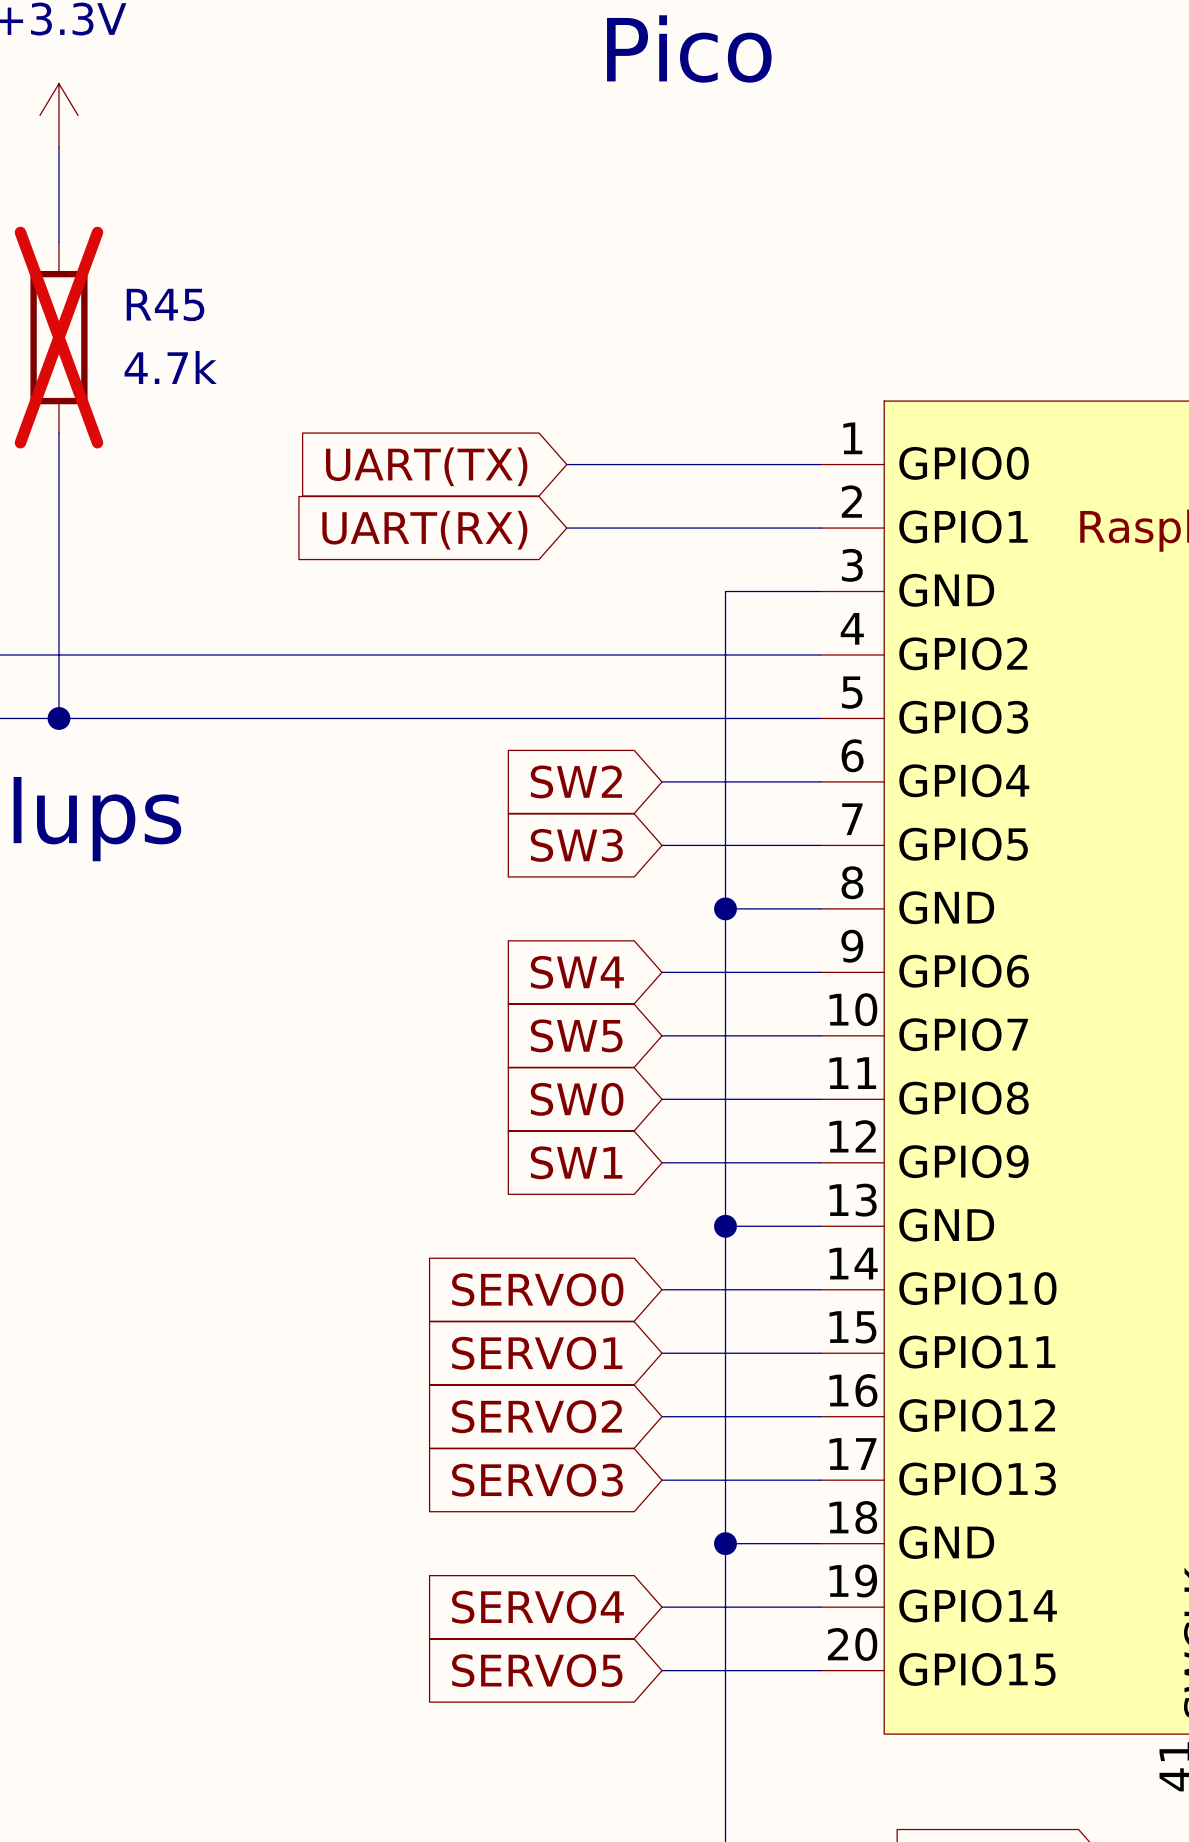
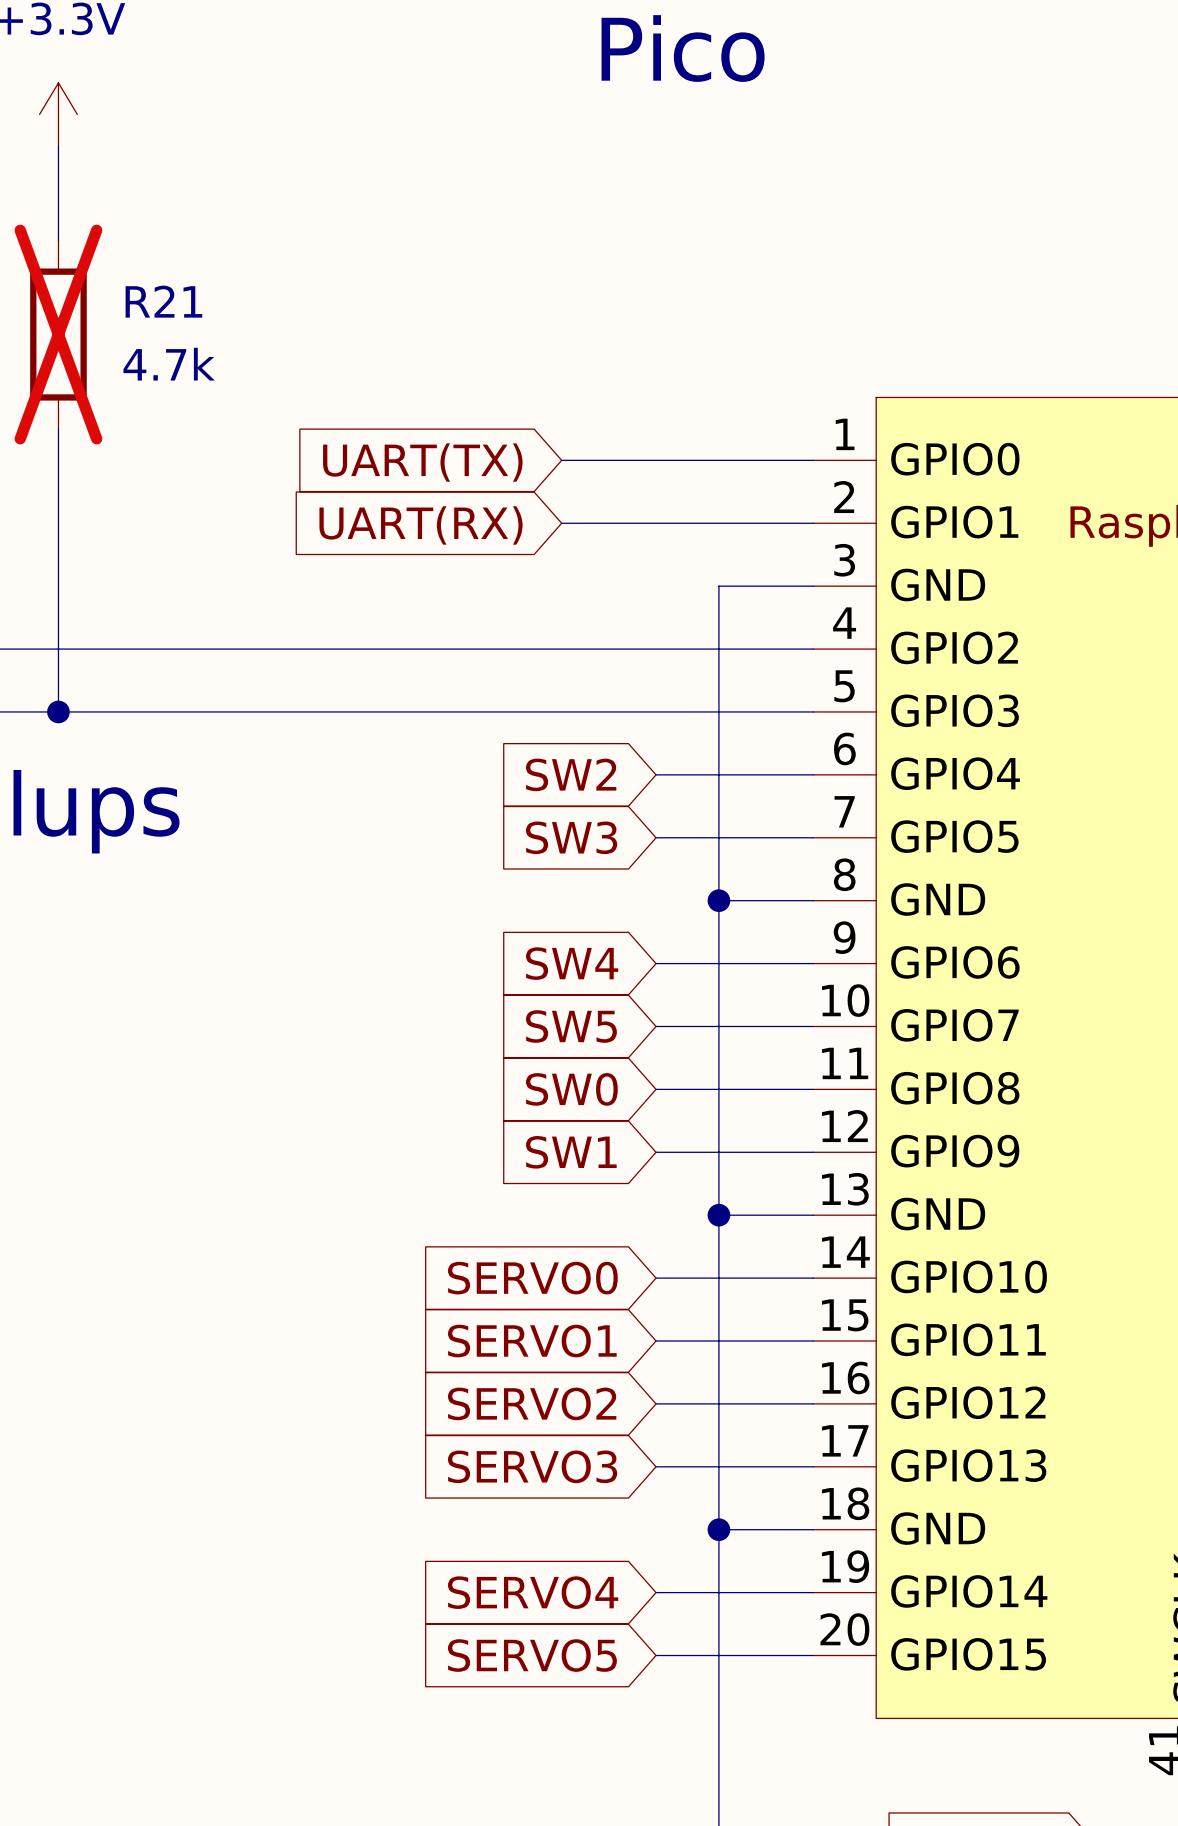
R45 name: R45 (165, 304) -> R21 (163, 301)

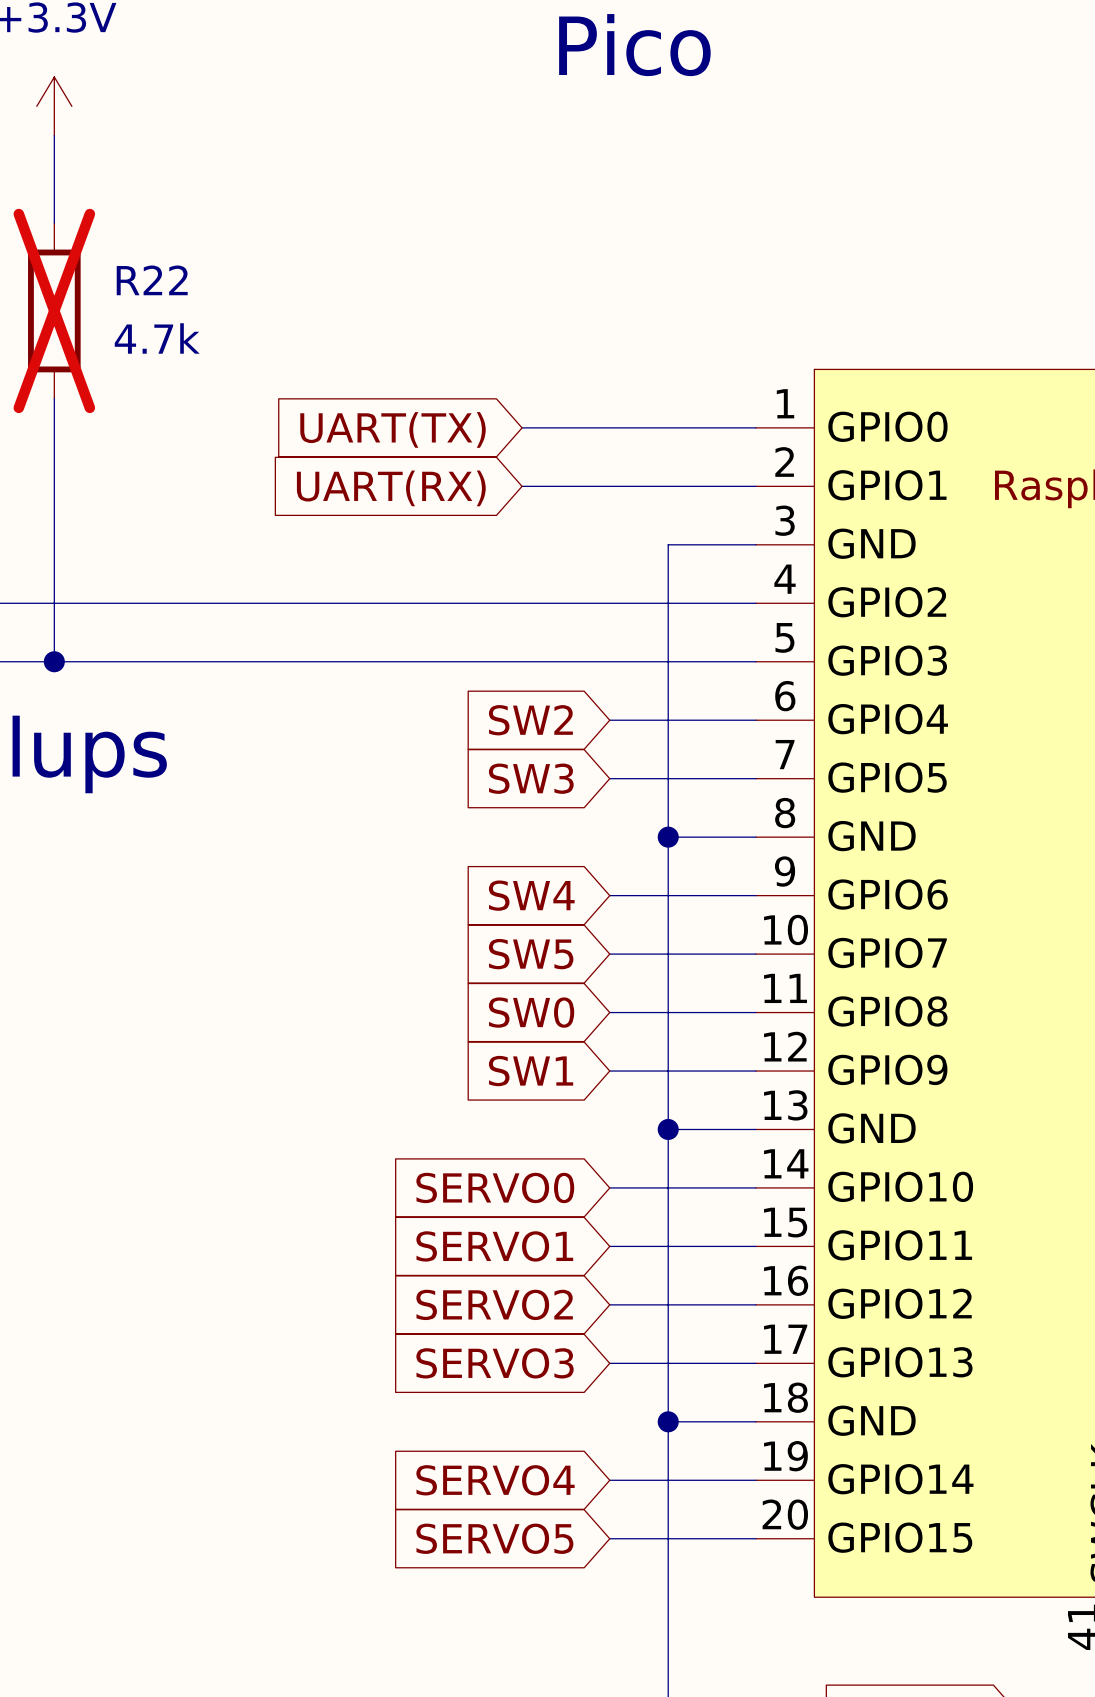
R21 name: R21 (163, 301) -> R22 (152, 280)

